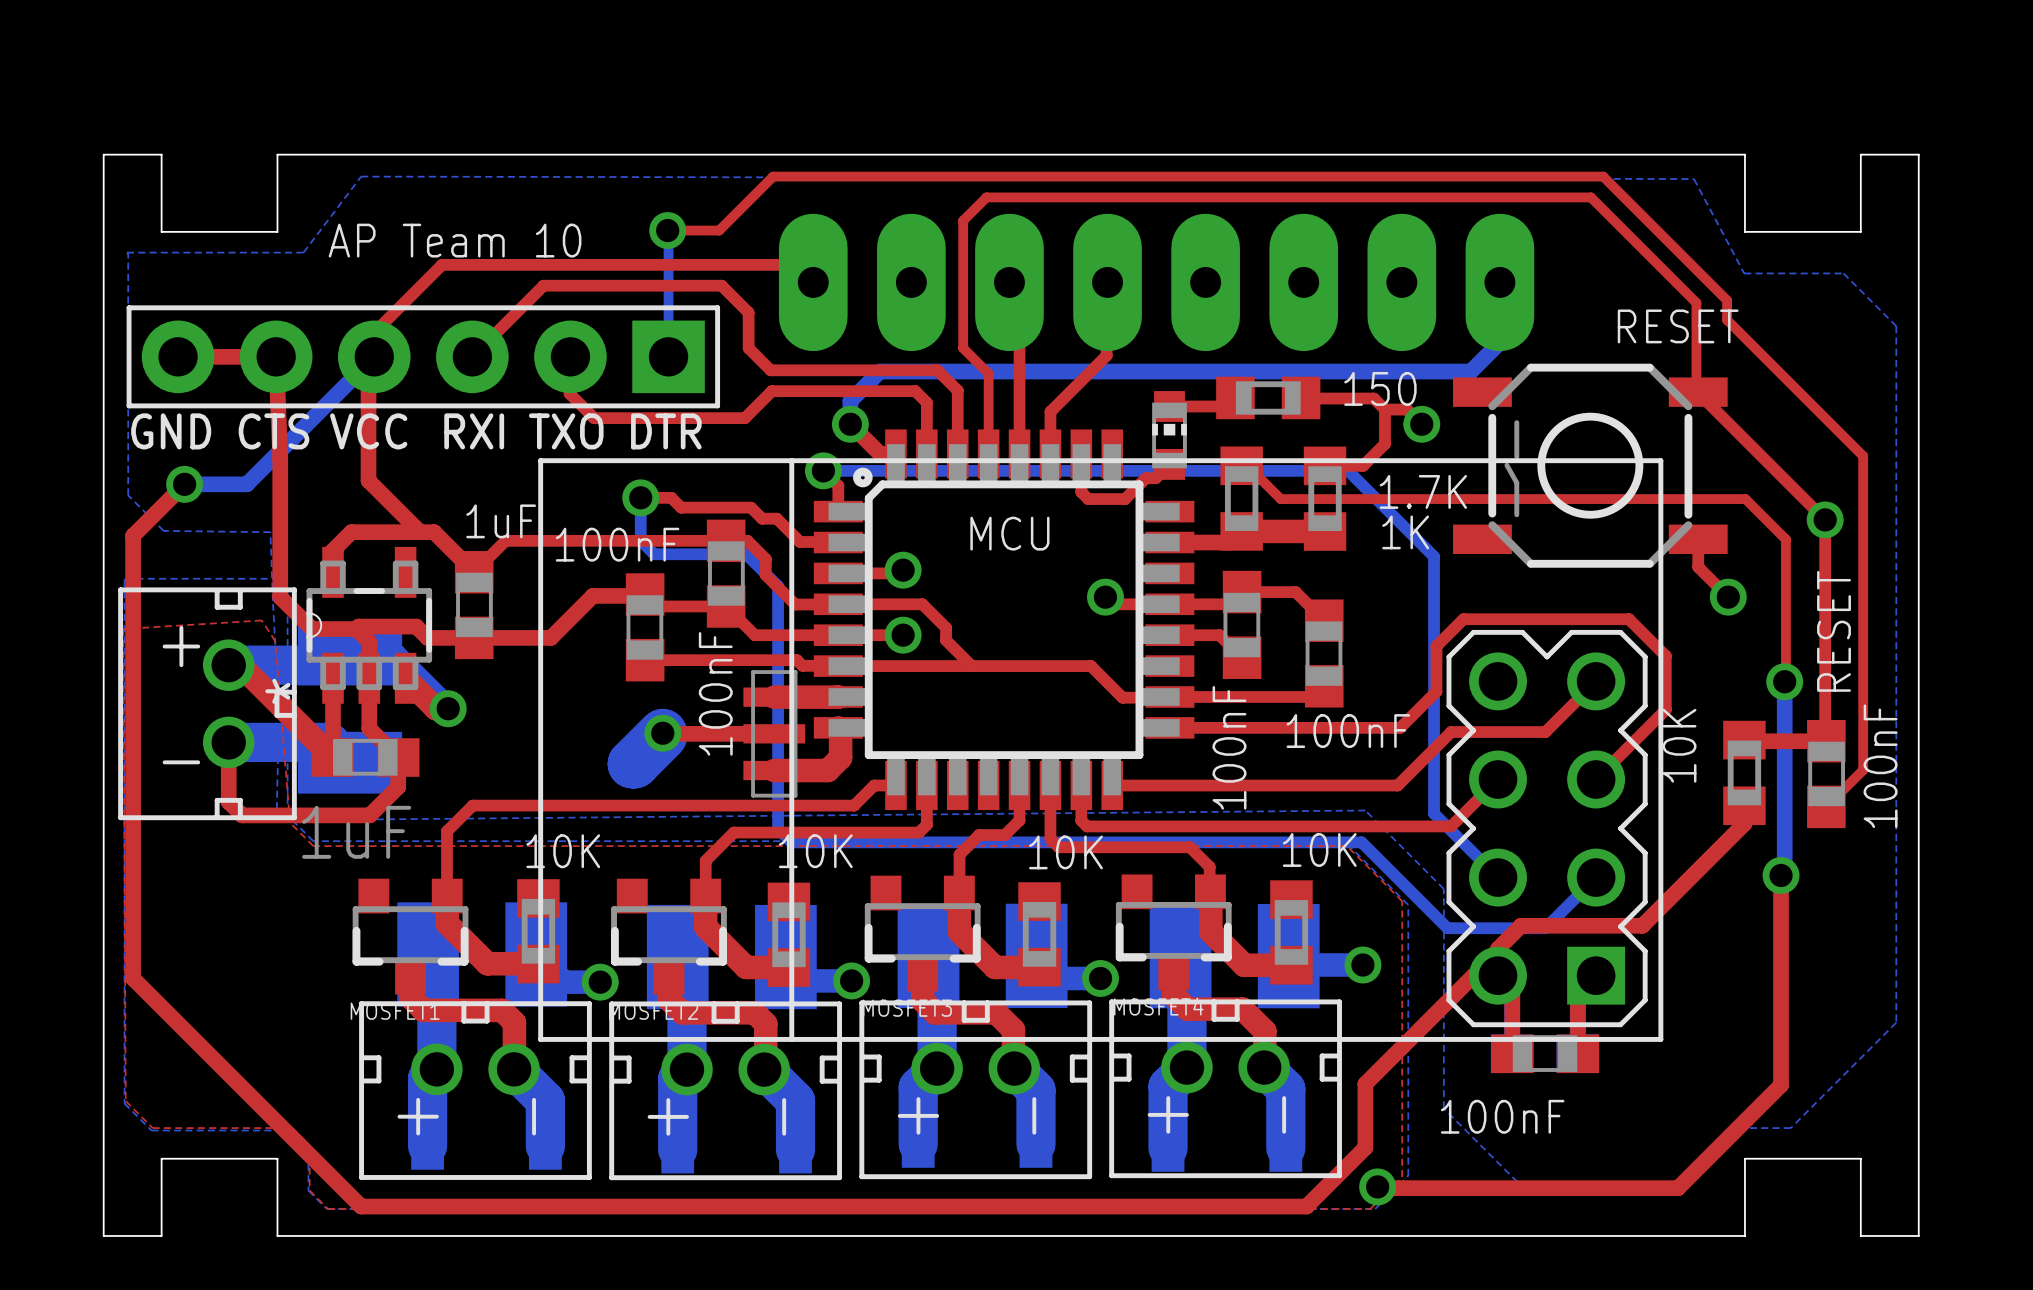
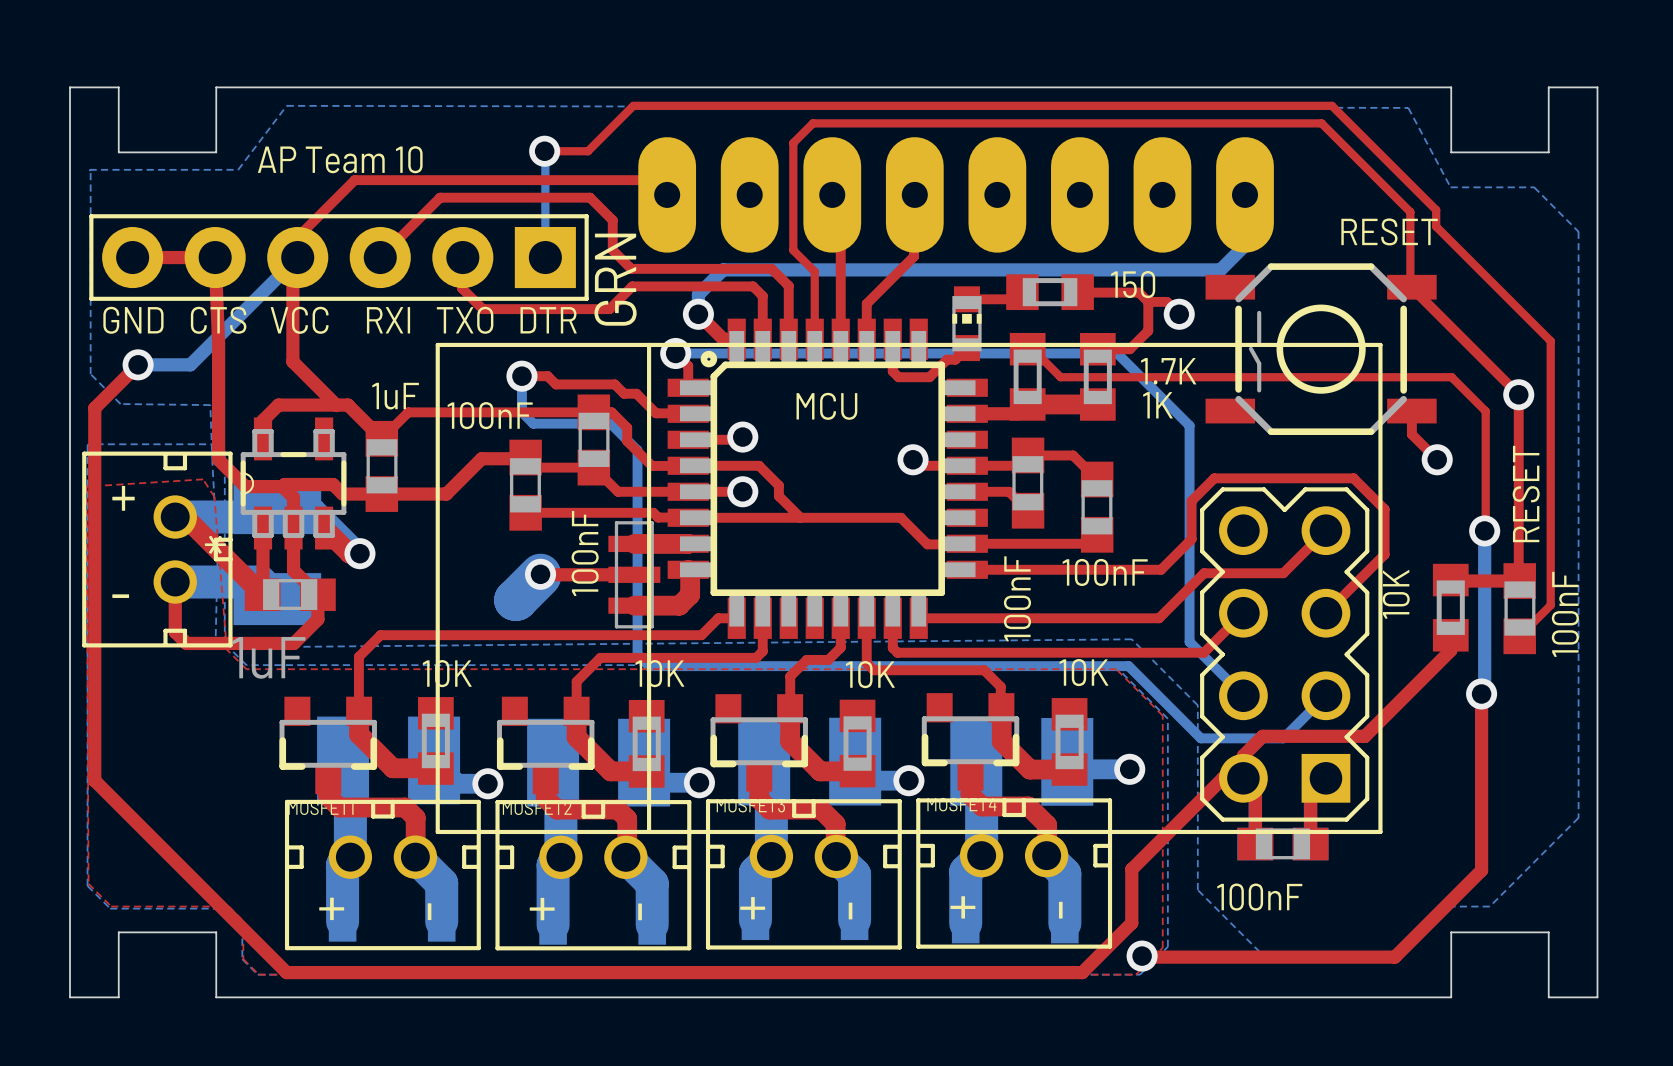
part text: none -> GRN (615, 279)

